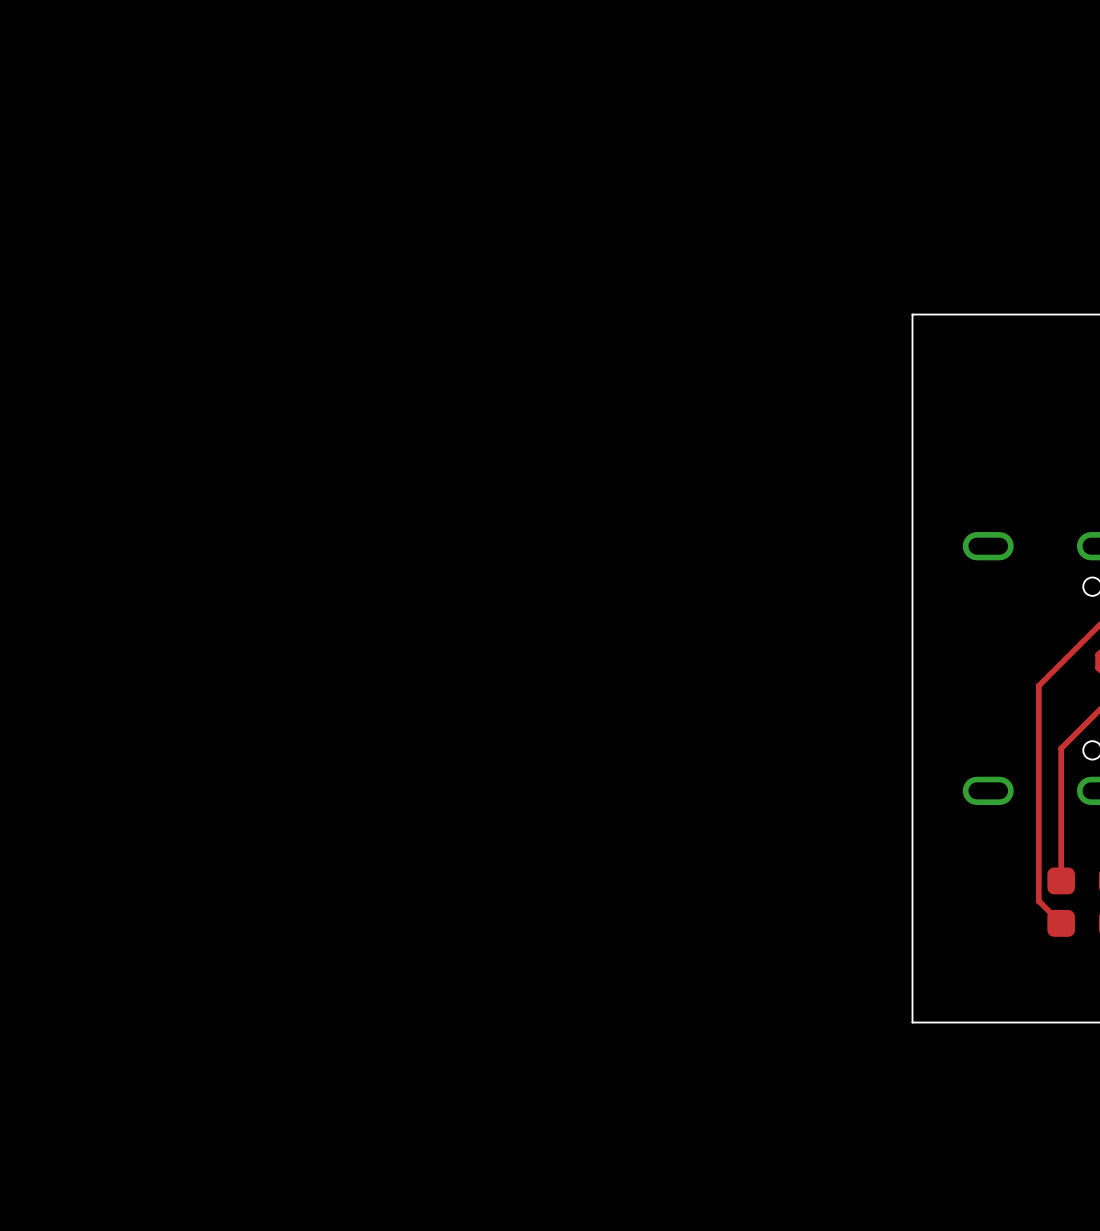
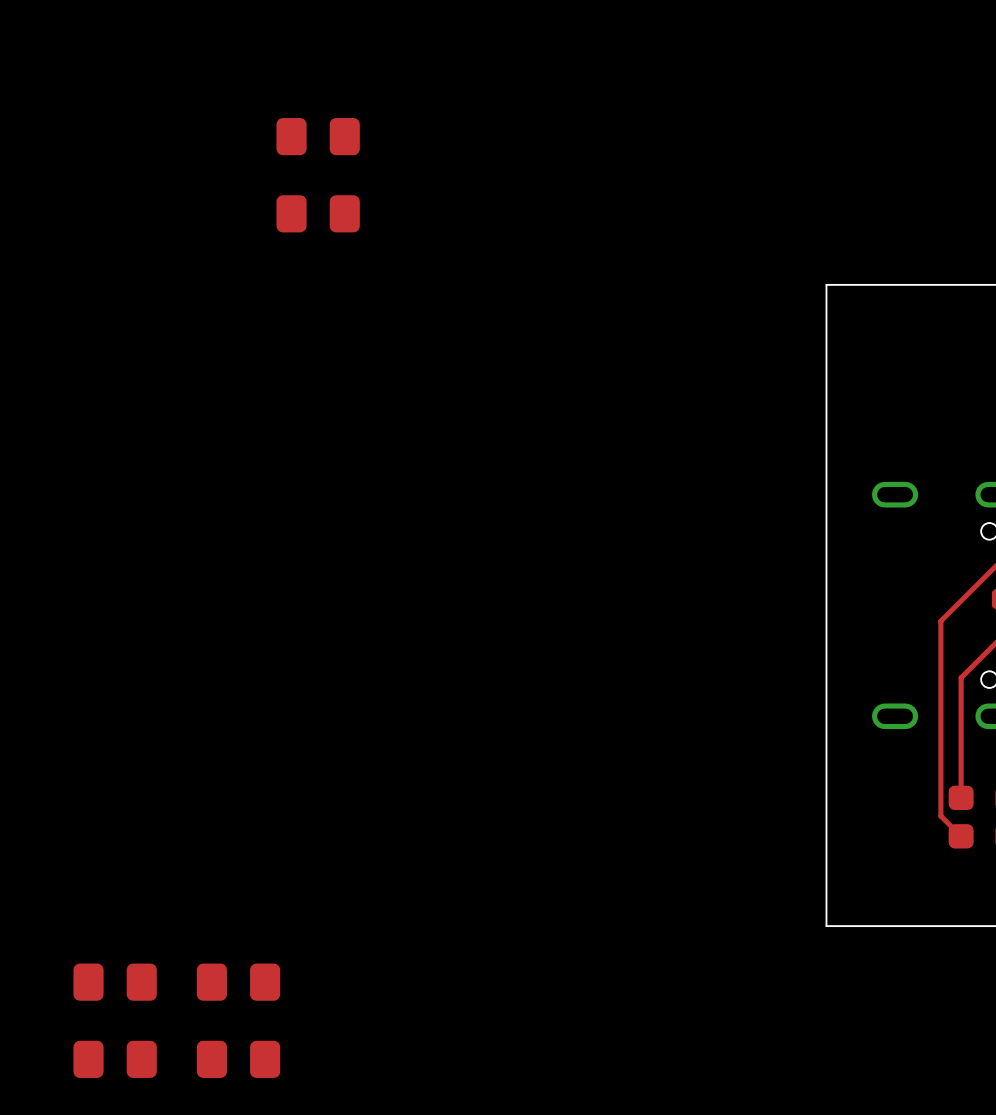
part: none -> (318, 136)
part: none -> (318, 213)
part: none -> (115, 982)
part: none -> (238, 982)
part: none -> (115, 1059)
part: none -> (238, 1059)

